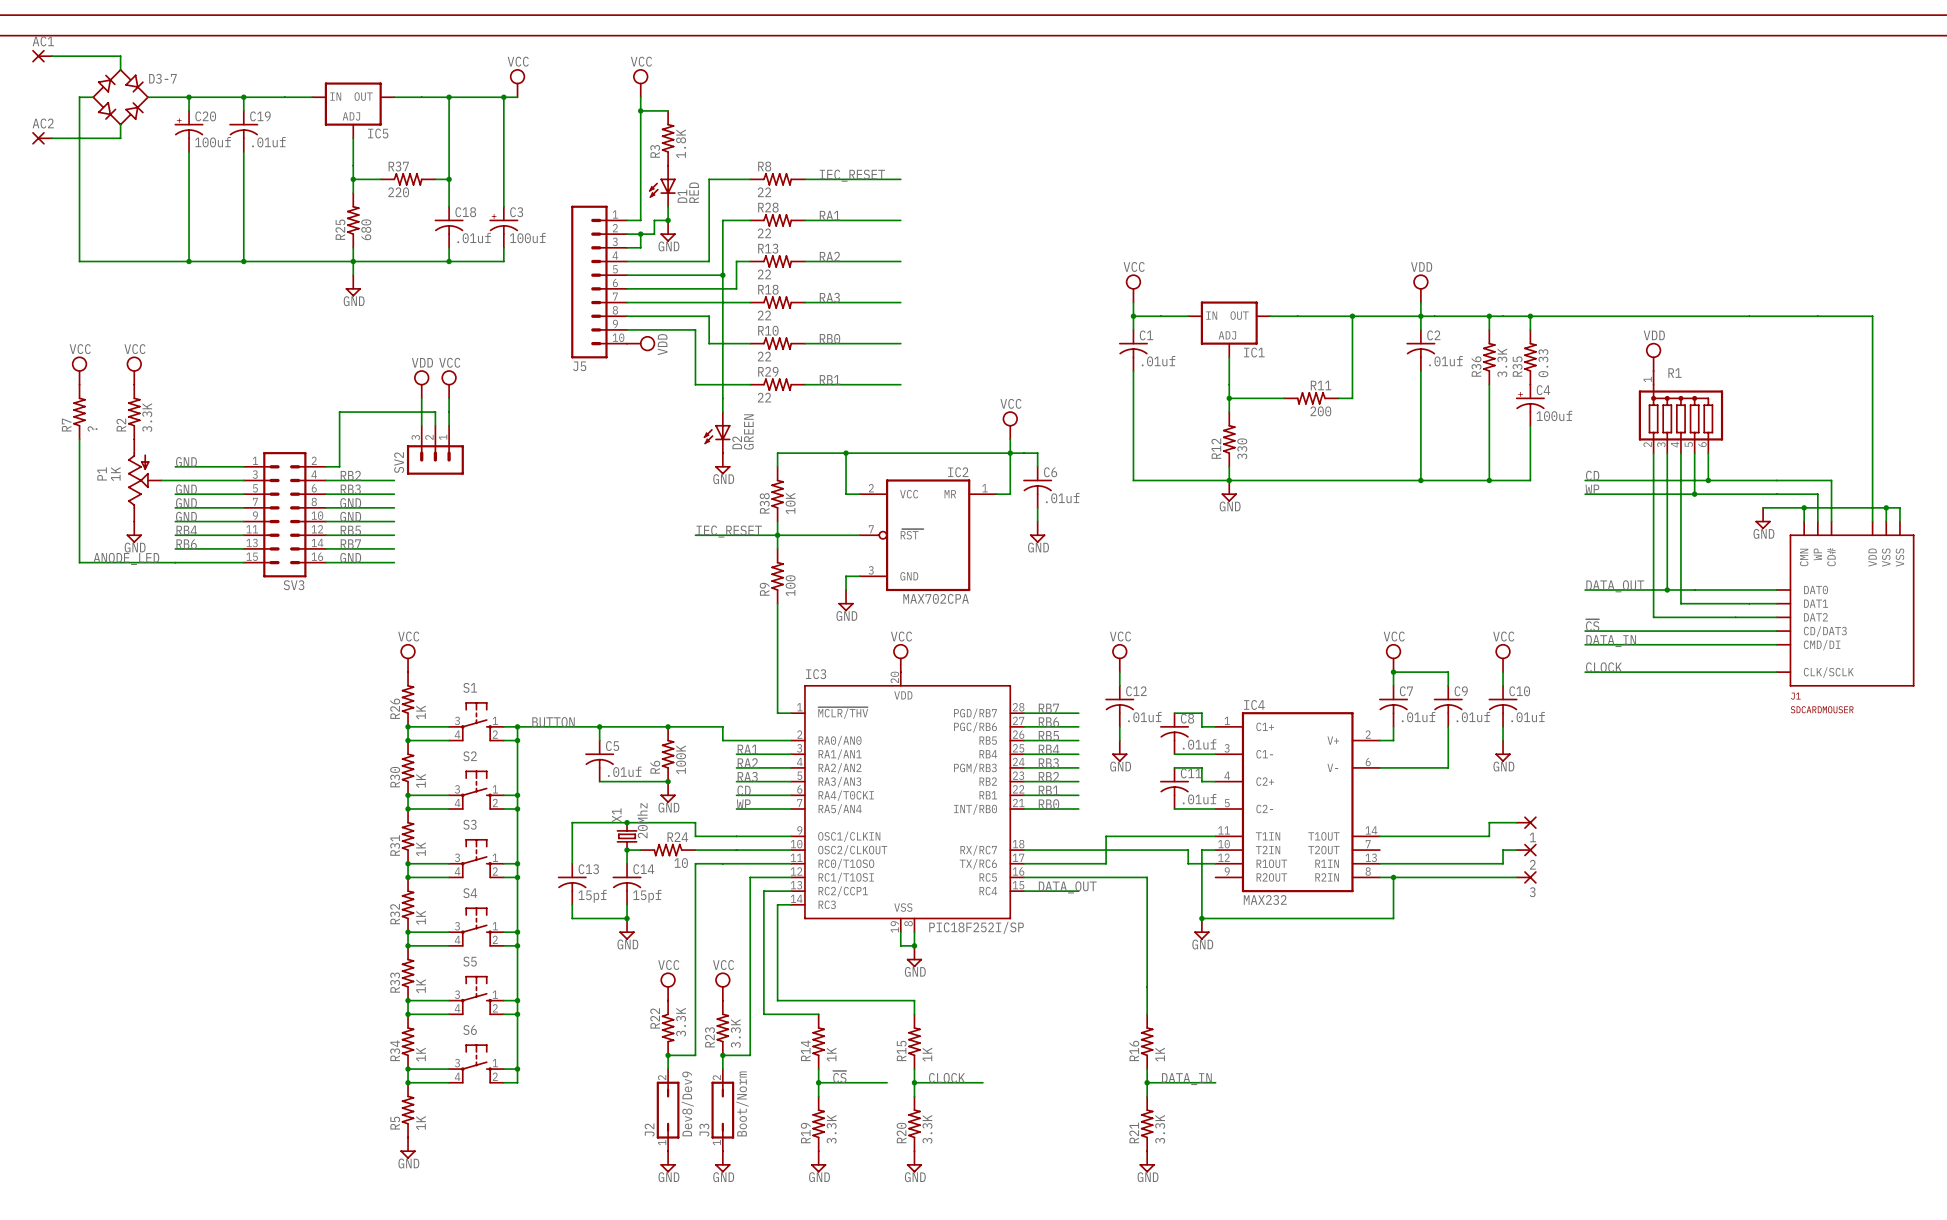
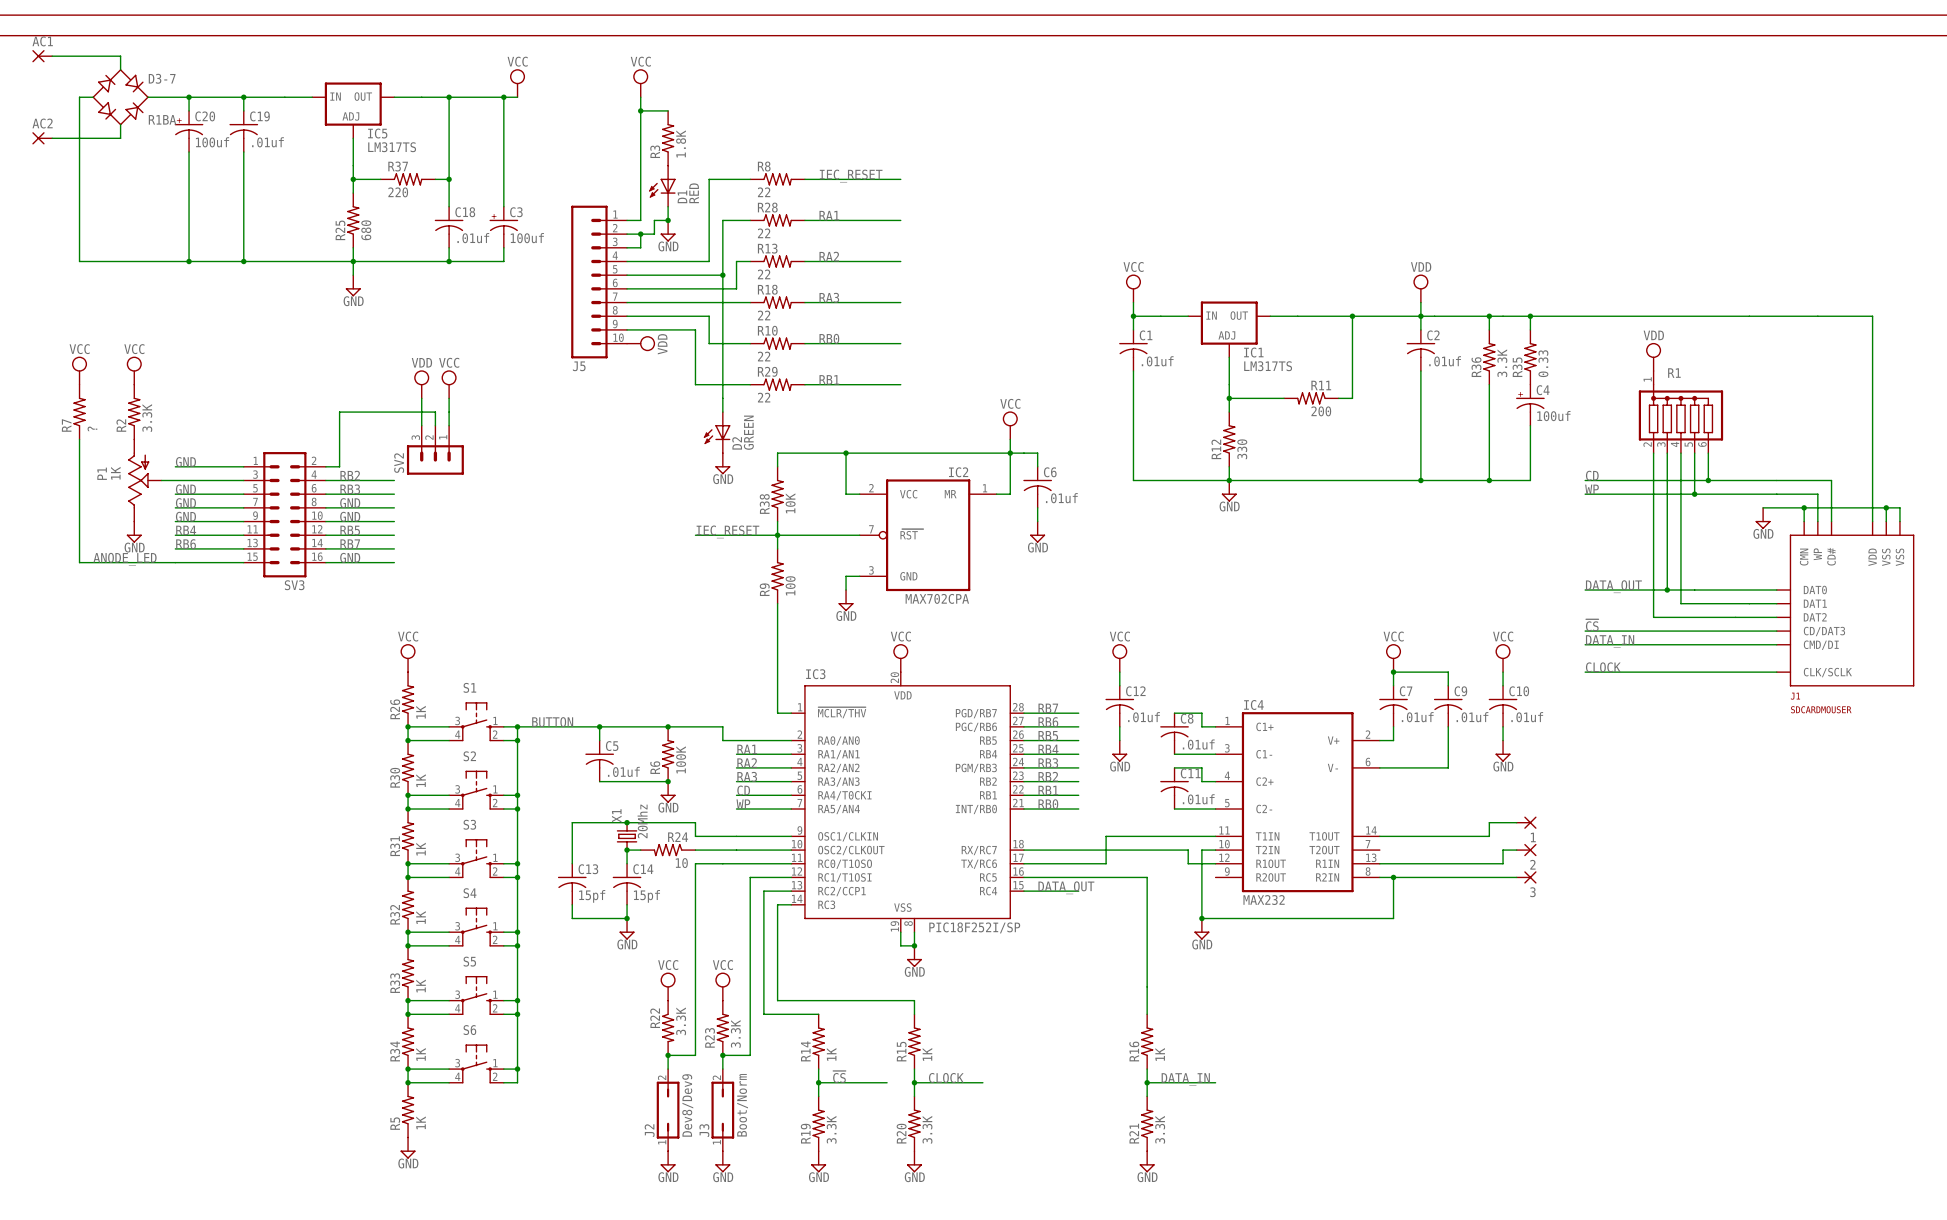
D3-7 value: none -> R1BA (162, 119)
IC5 value: none -> LM317TS (392, 147)
IC1 value: none -> LM317TS (1268, 366)

